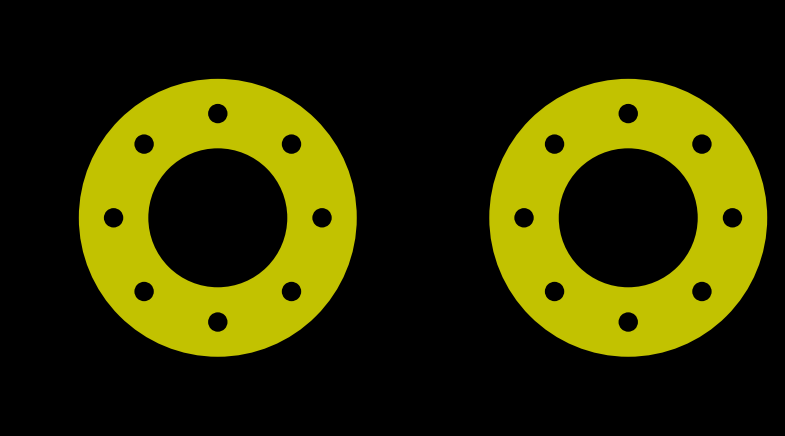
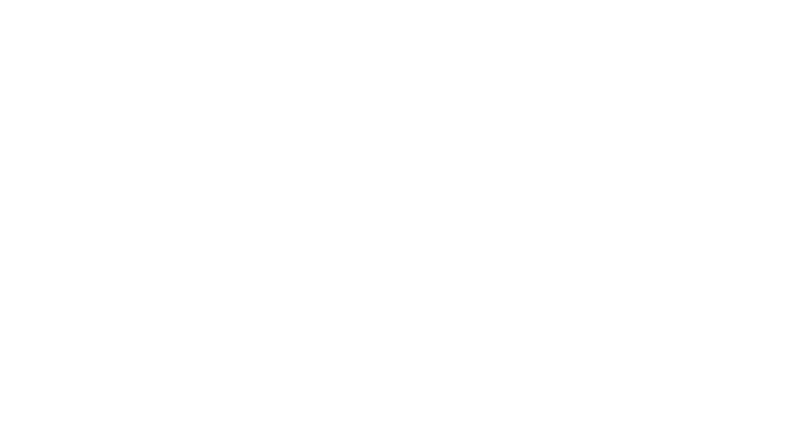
part: (217, 217) -> none
part: (628, 217) -> none

